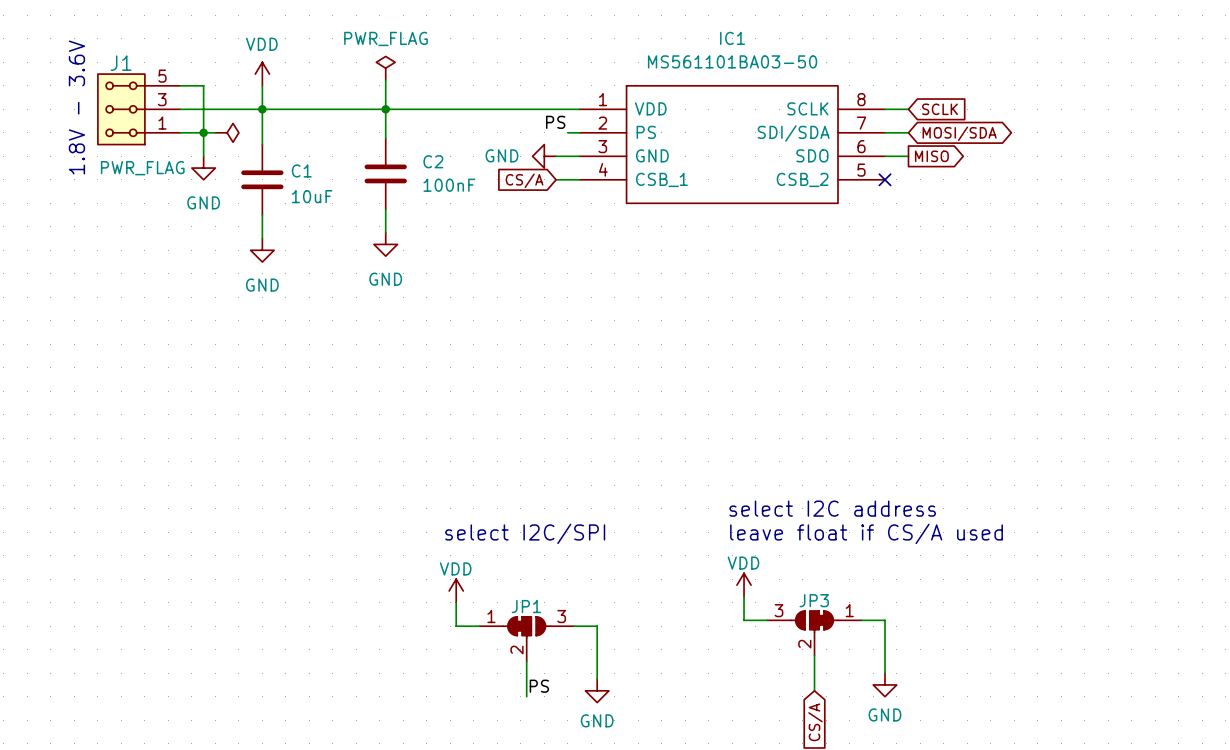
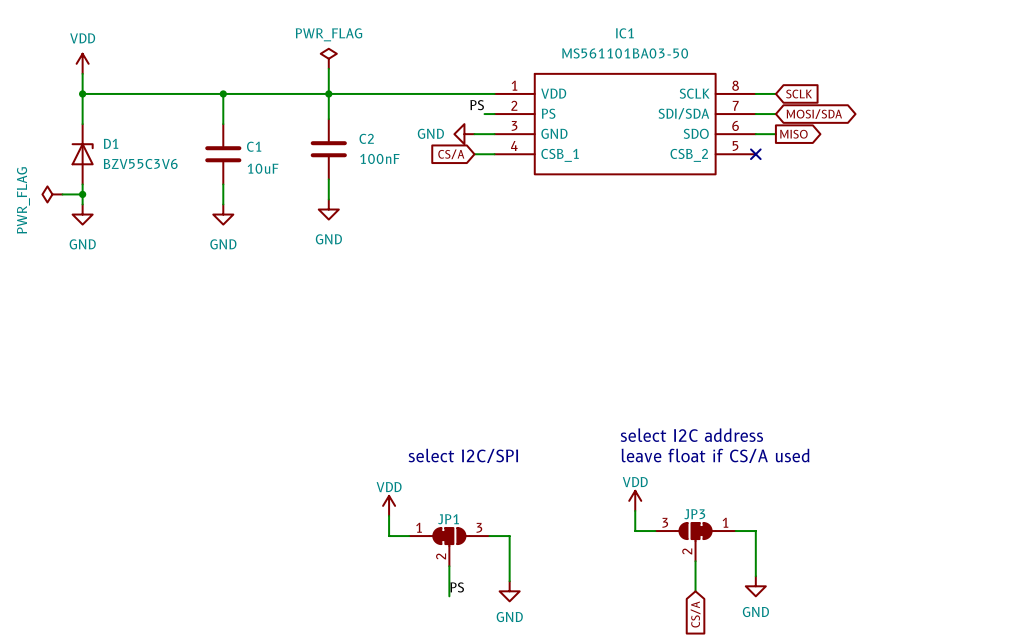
power symbol position: VDD (262, 74) -> VDD (82, 63)
wire: (180, 85) (203, 85) (203, 156) -> none
wire: (262, 85) (262, 109) -> (82, 184) (82, 204)
text: 1.8V - 3.6V (76, 107) -> none
junction: none -> (82, 93)
J1: (139, 109) -> none
wire: (180, 132) (215, 132) -> none
junction: (203, 132) -> none
power symbol rotation: 0° (227, 132) -> 180° (52, 194)
power symbol position: PWR_FLAG (227, 132) -> PWR_FLAG (52, 194)
power symbol text position: PWR_FLAG (142, 168) -> PWR_FLAG (23, 200)
power symbol position: GND (203, 168) -> GND (82, 214)
D1: none -> BZV55C3V6 (82, 154)
wire: none -> (62, 194) (82, 194)
junction: none -> (82, 194)

